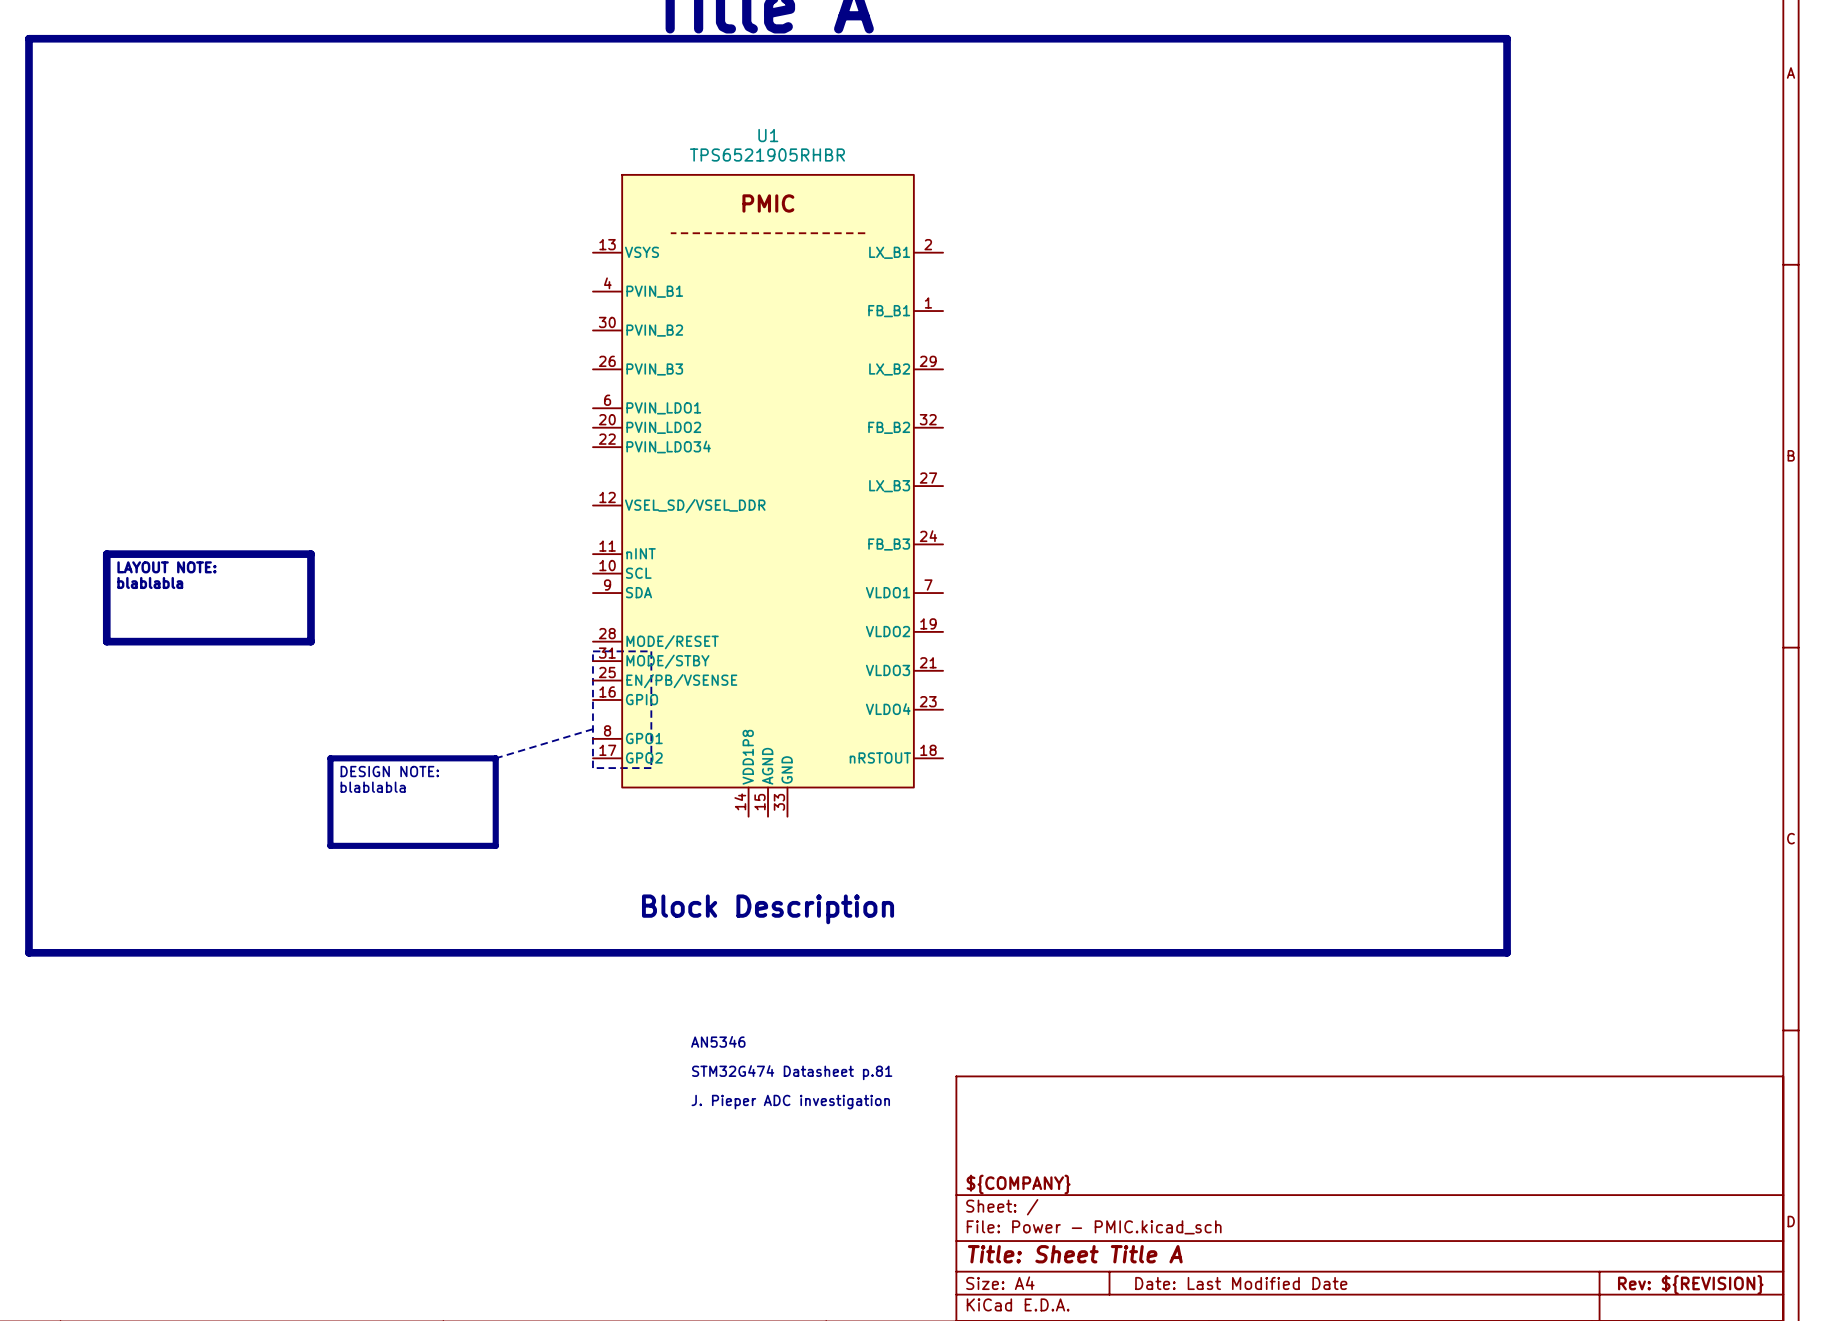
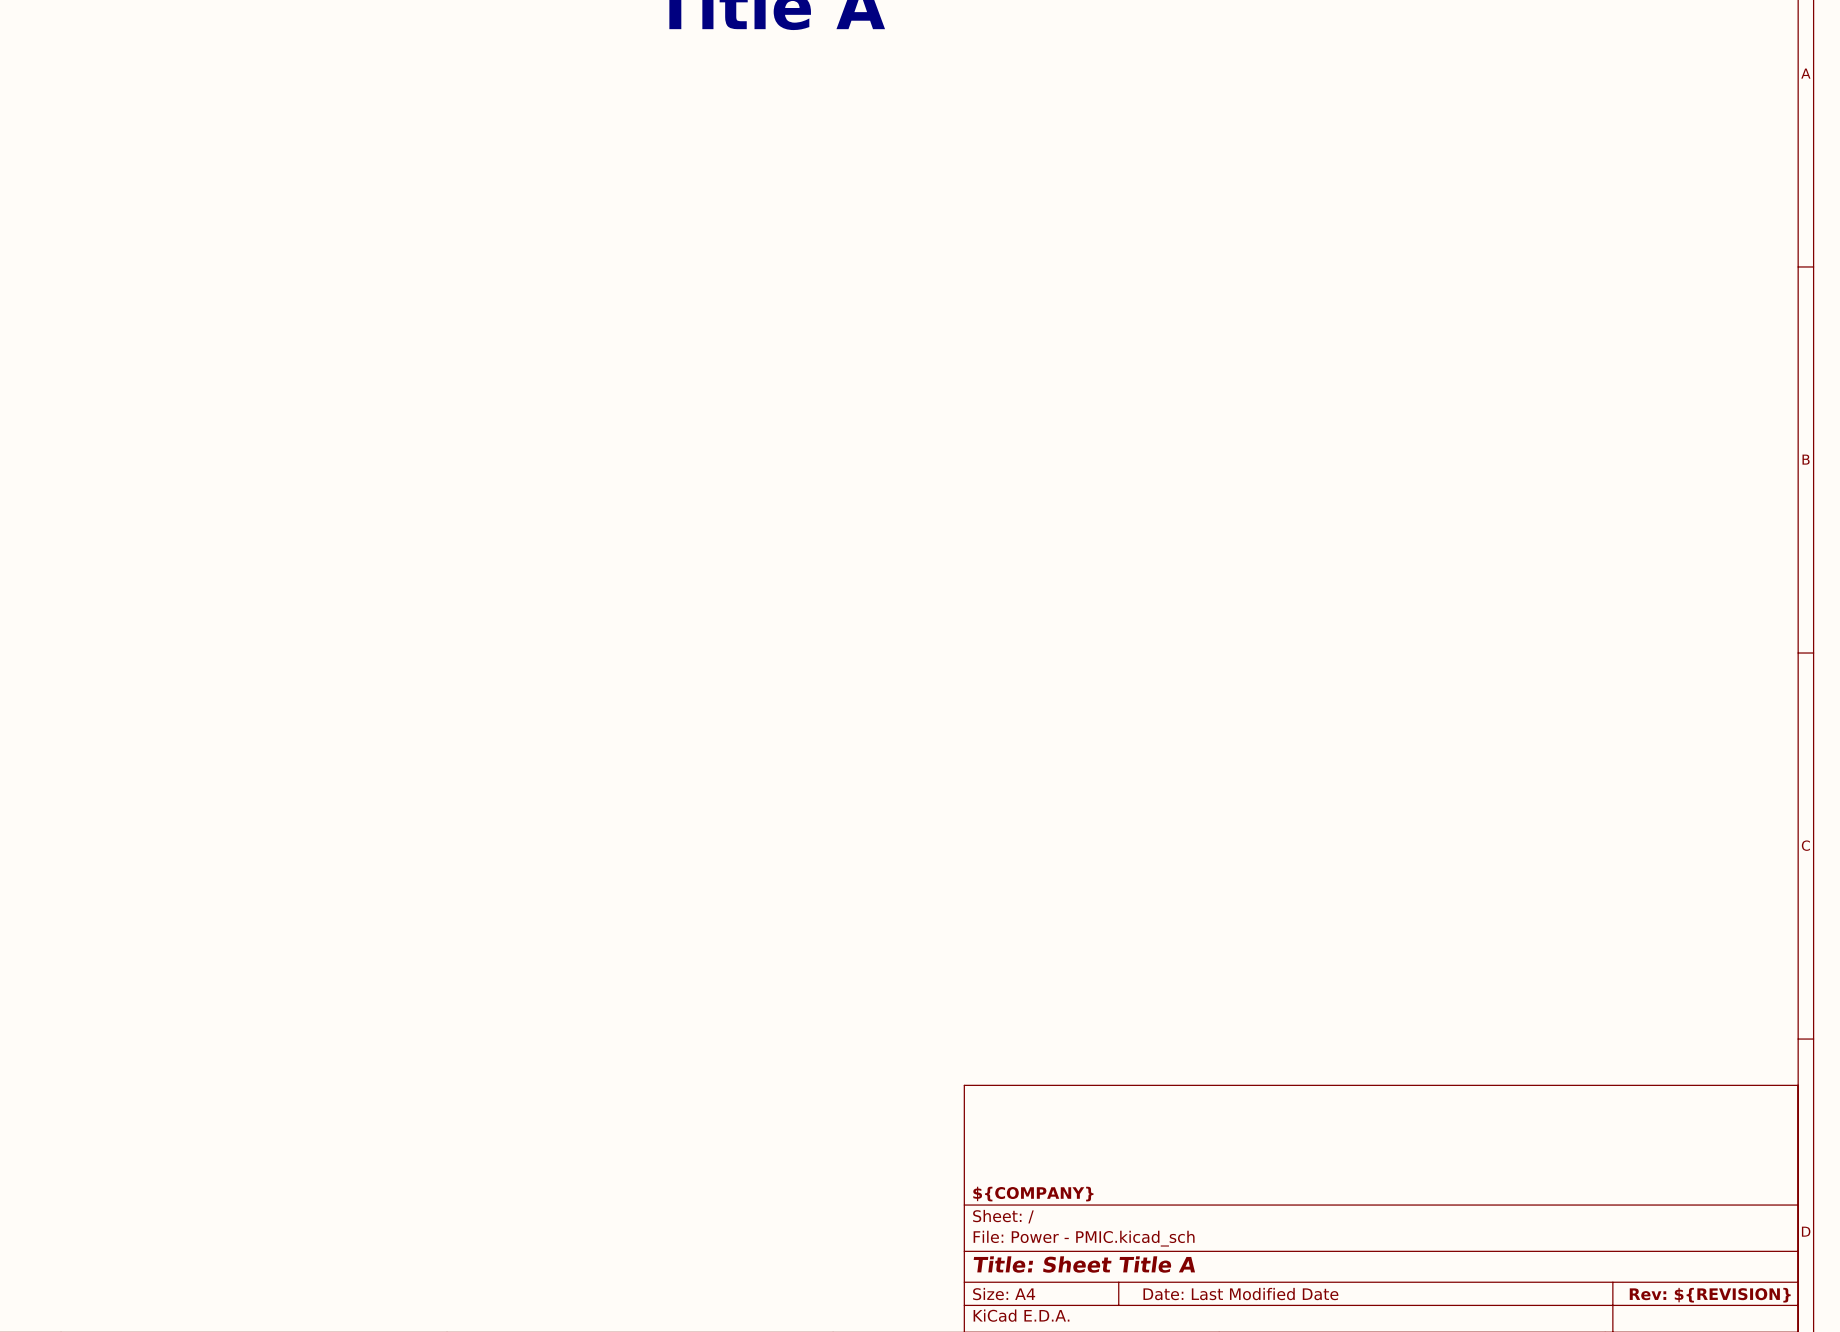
line: (28, 38) (1507, 38) (1507, 952) (28, 952) (28, 38) -> none
U1: TPS6521905RHBR (768, 495) -> none
line: (106, 554) (310, 554) (310, 641) (106, 641) (106, 554) -> none
text: LAYOUT NOTE: (166, 567) -> none
text: blablabla (150, 582) -> none
line: (592, 651) (651, 651) (651, 768) (592, 768) (592, 651) -> none
line: (592, 729) (495, 758) -> none
line: (495, 758) (330, 758) (330, 845) (495, 845) (495, 758) -> none
text: DESIGN NOTE: (389, 771) -> none
text: blablabla (373, 787) -> none
text: Block Description (768, 909) -> none
text: AN5346 (718, 1041) -> none
text: STM32G474 Datasheet p.81 (792, 1072) -> none
text: J. Pieper ADC investigation (790, 1102) -> none

